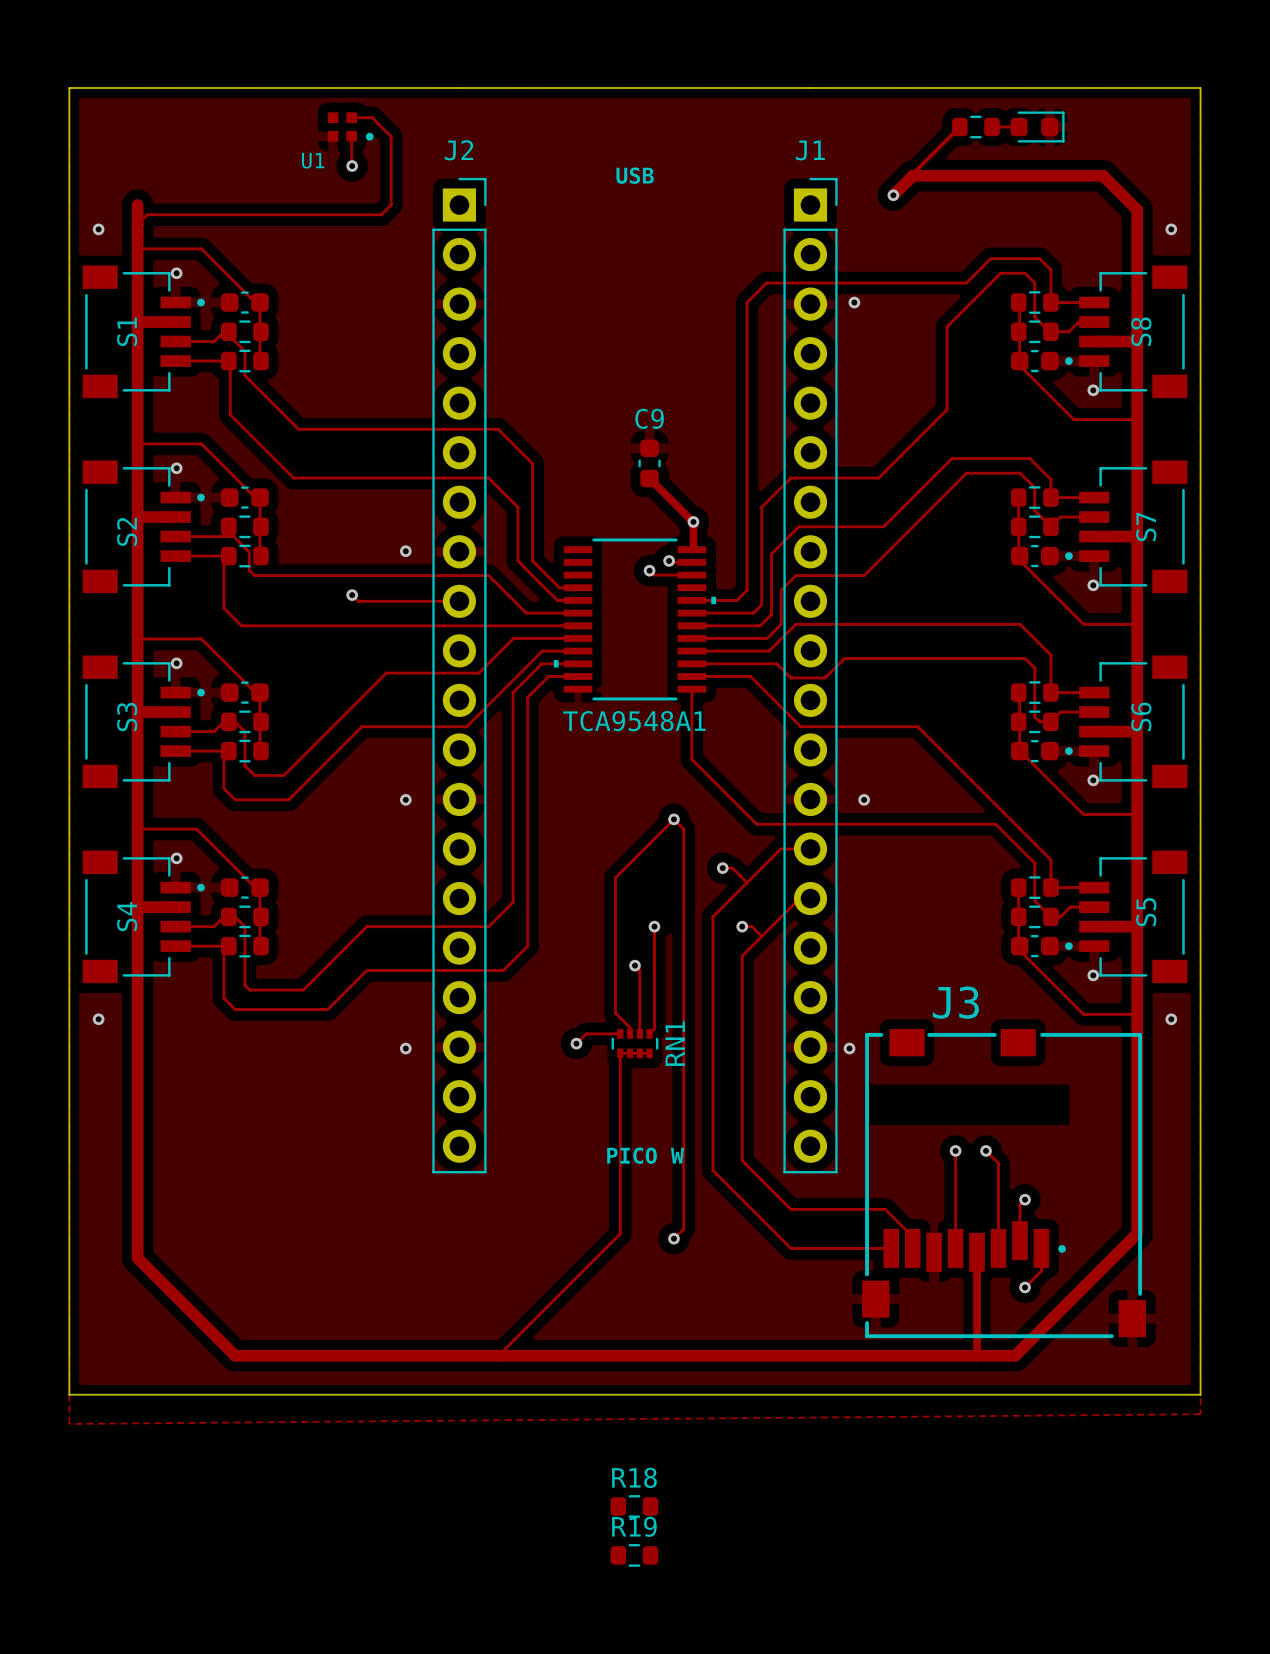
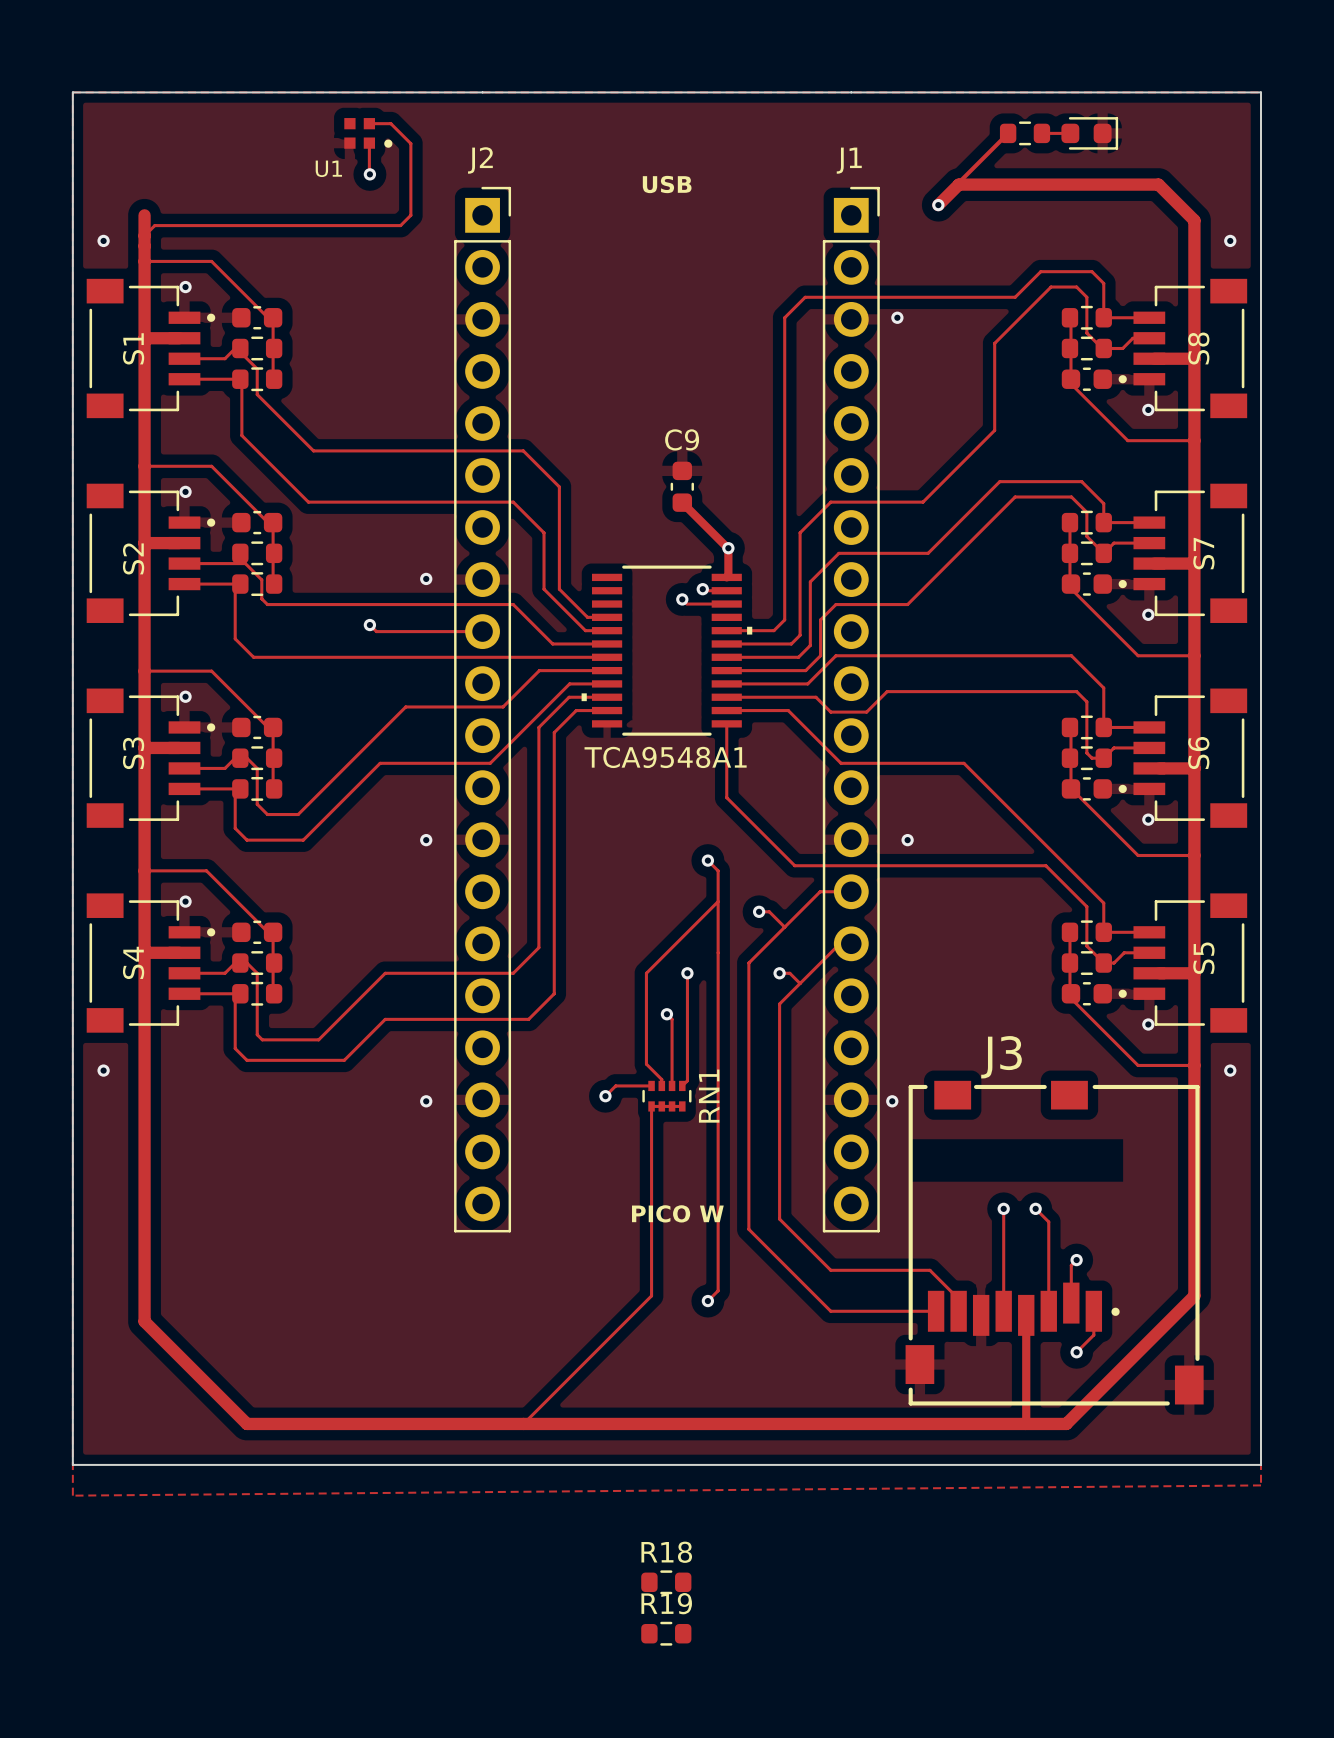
track: (673, 819) (615, 877) (615, 926) -> (718, 901) (646, 973)

